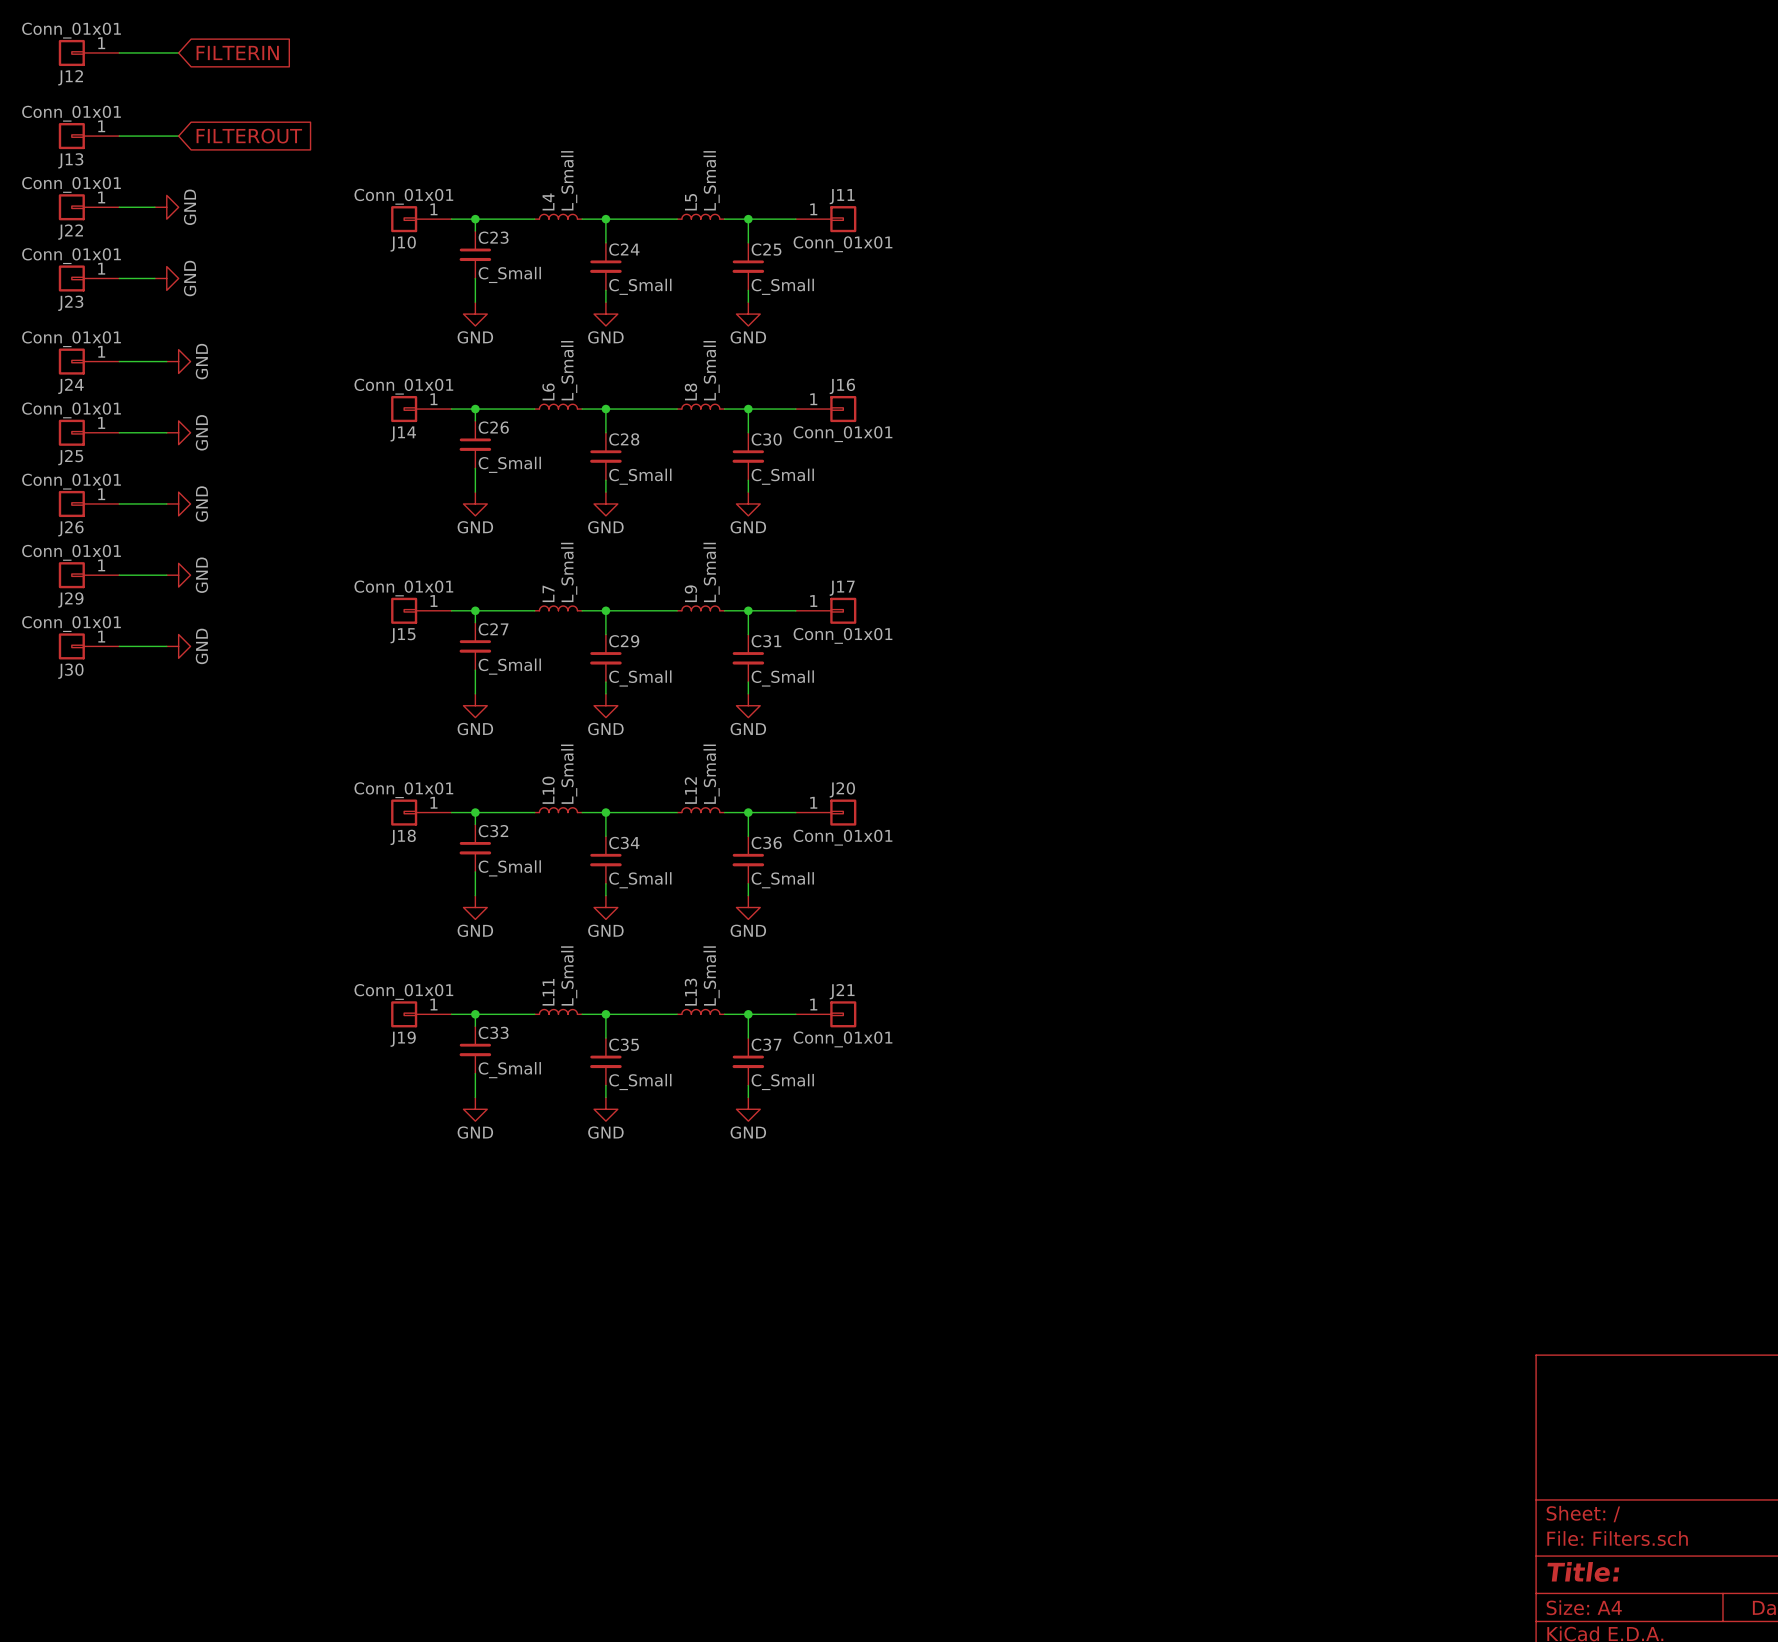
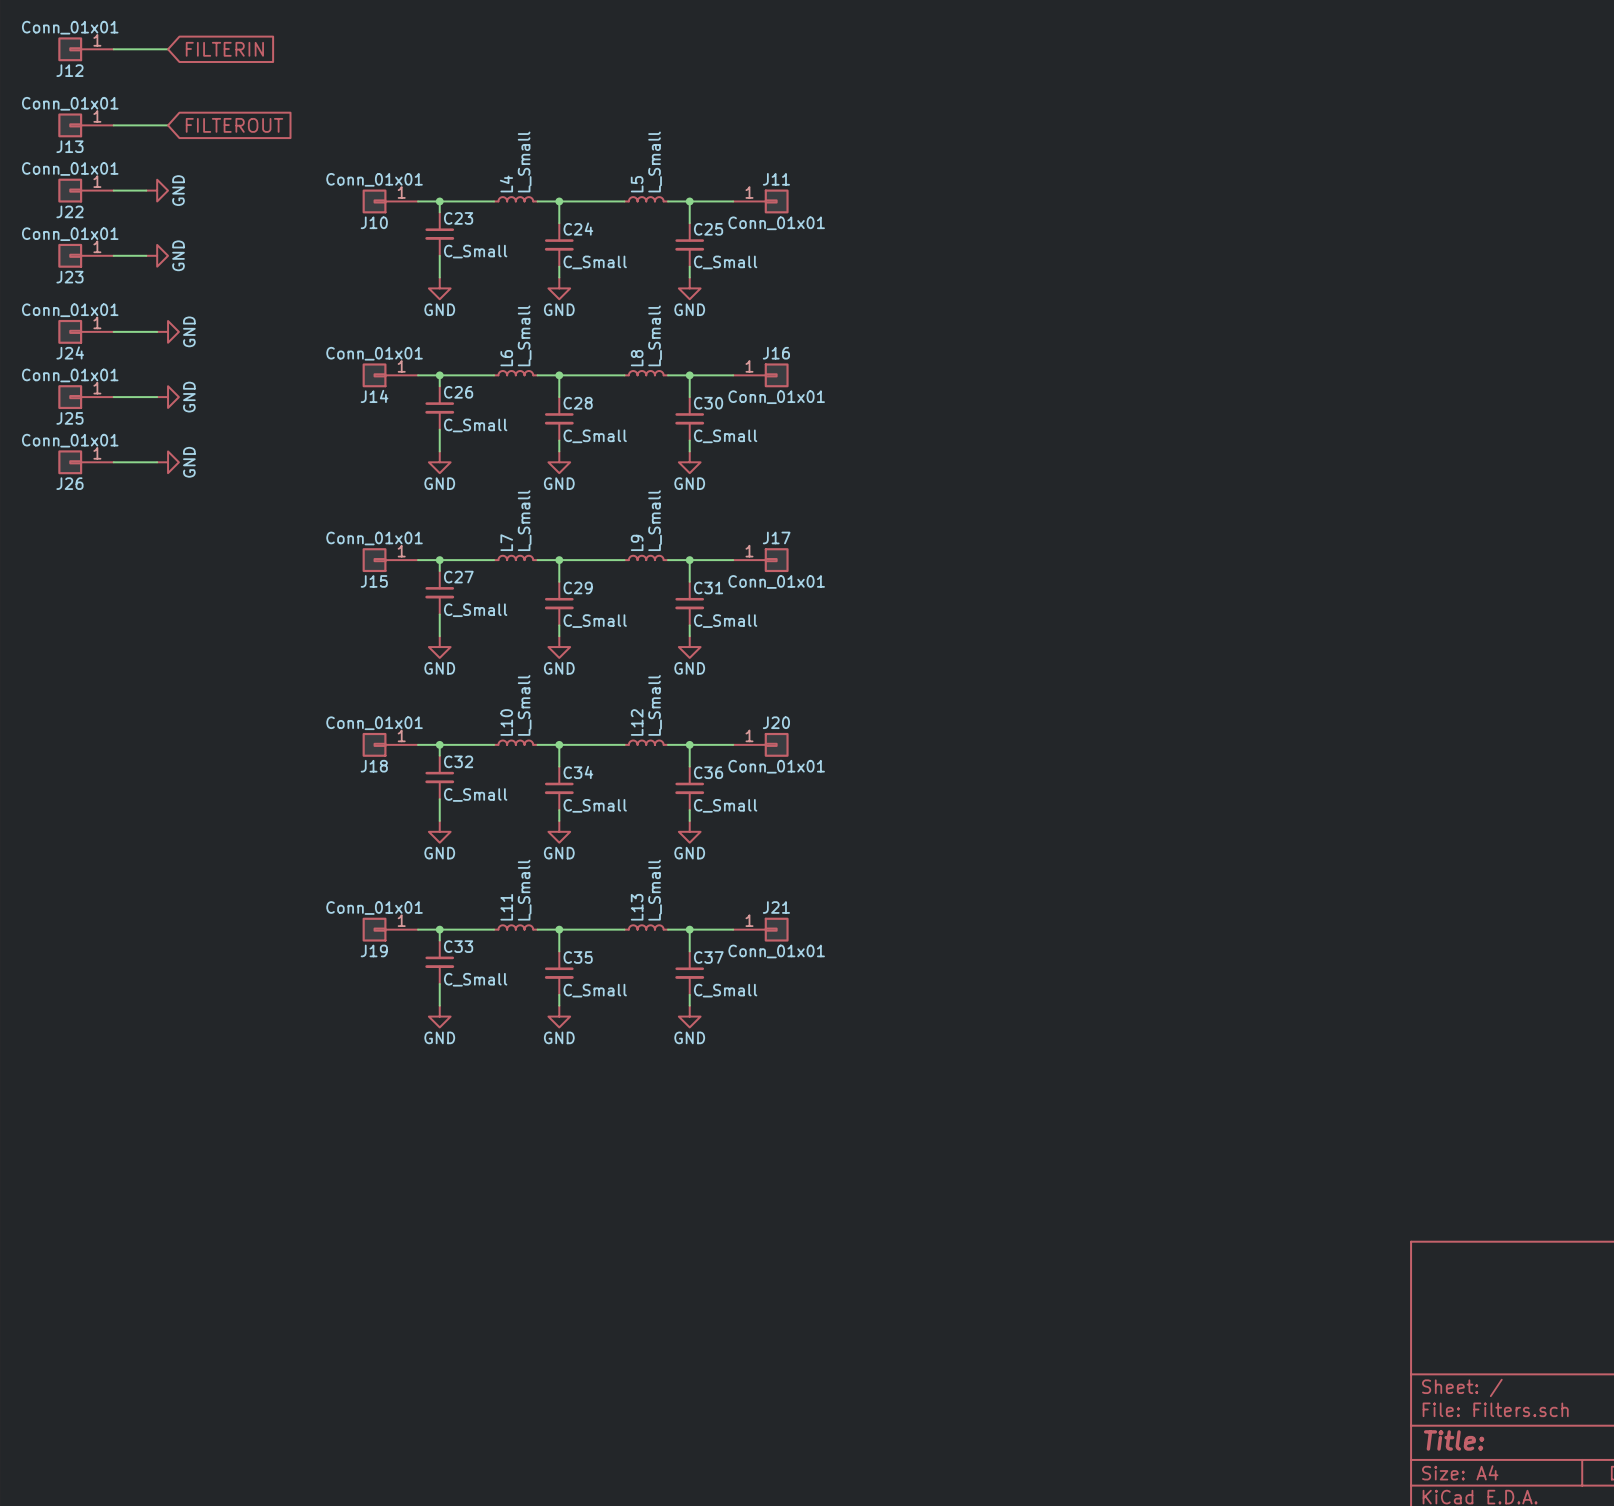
J29: Conn_01x01 (89, 575) -> none
wire: (119, 575) (166, 575) -> none
power symbol: GND (178, 575) -> none
J30: Conn_01x01 (89, 646) -> none
wire: (119, 646) (166, 646) -> none
power symbol: GND (178, 646) -> none

